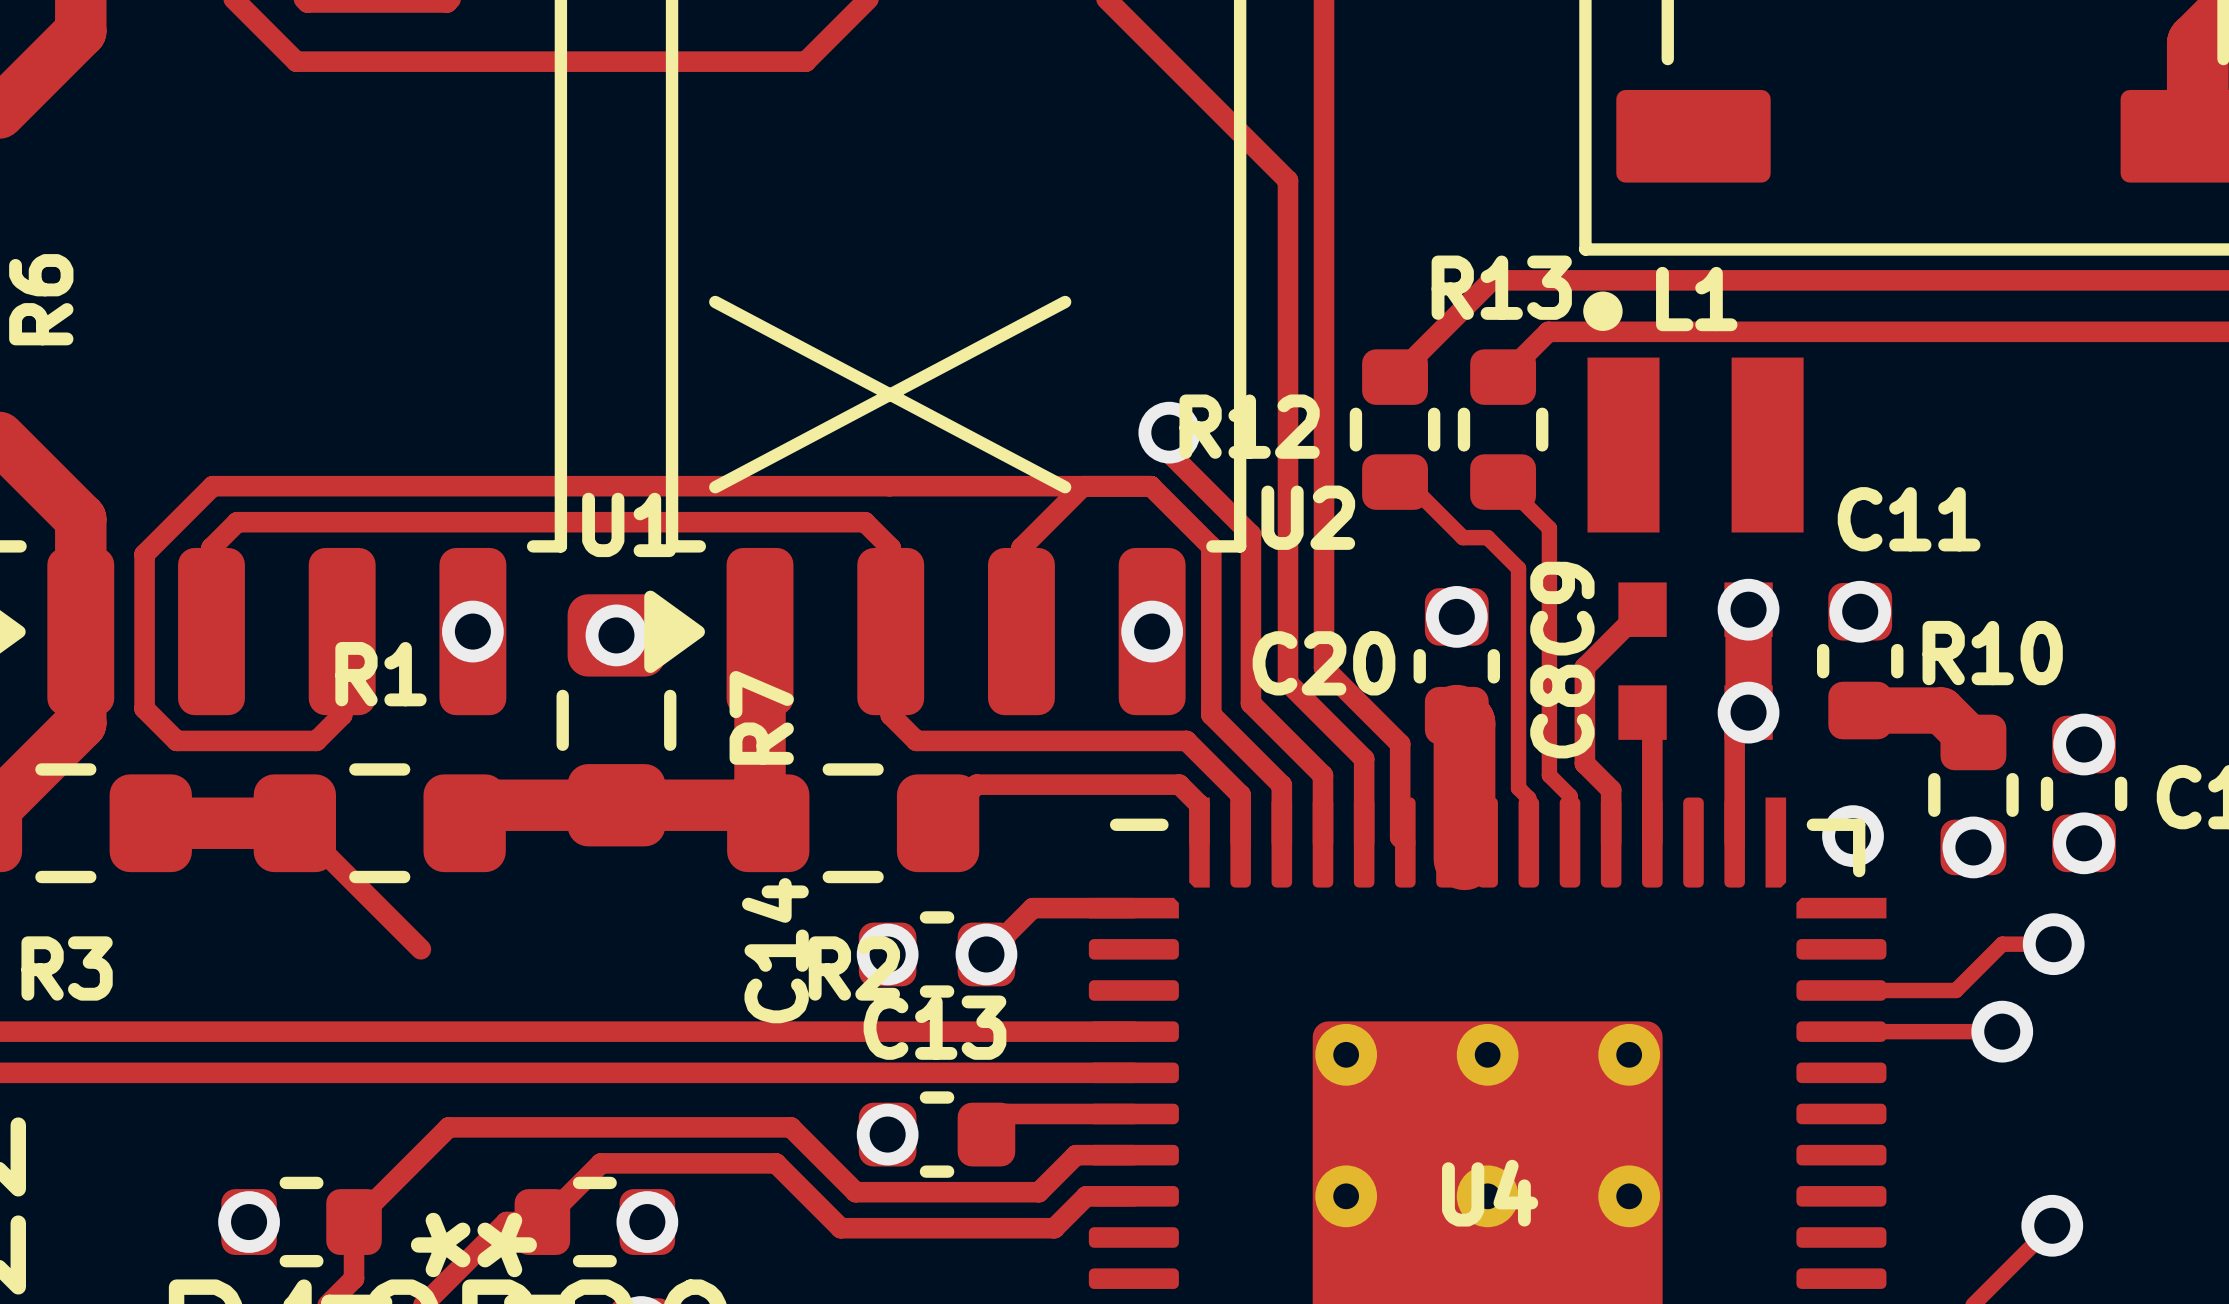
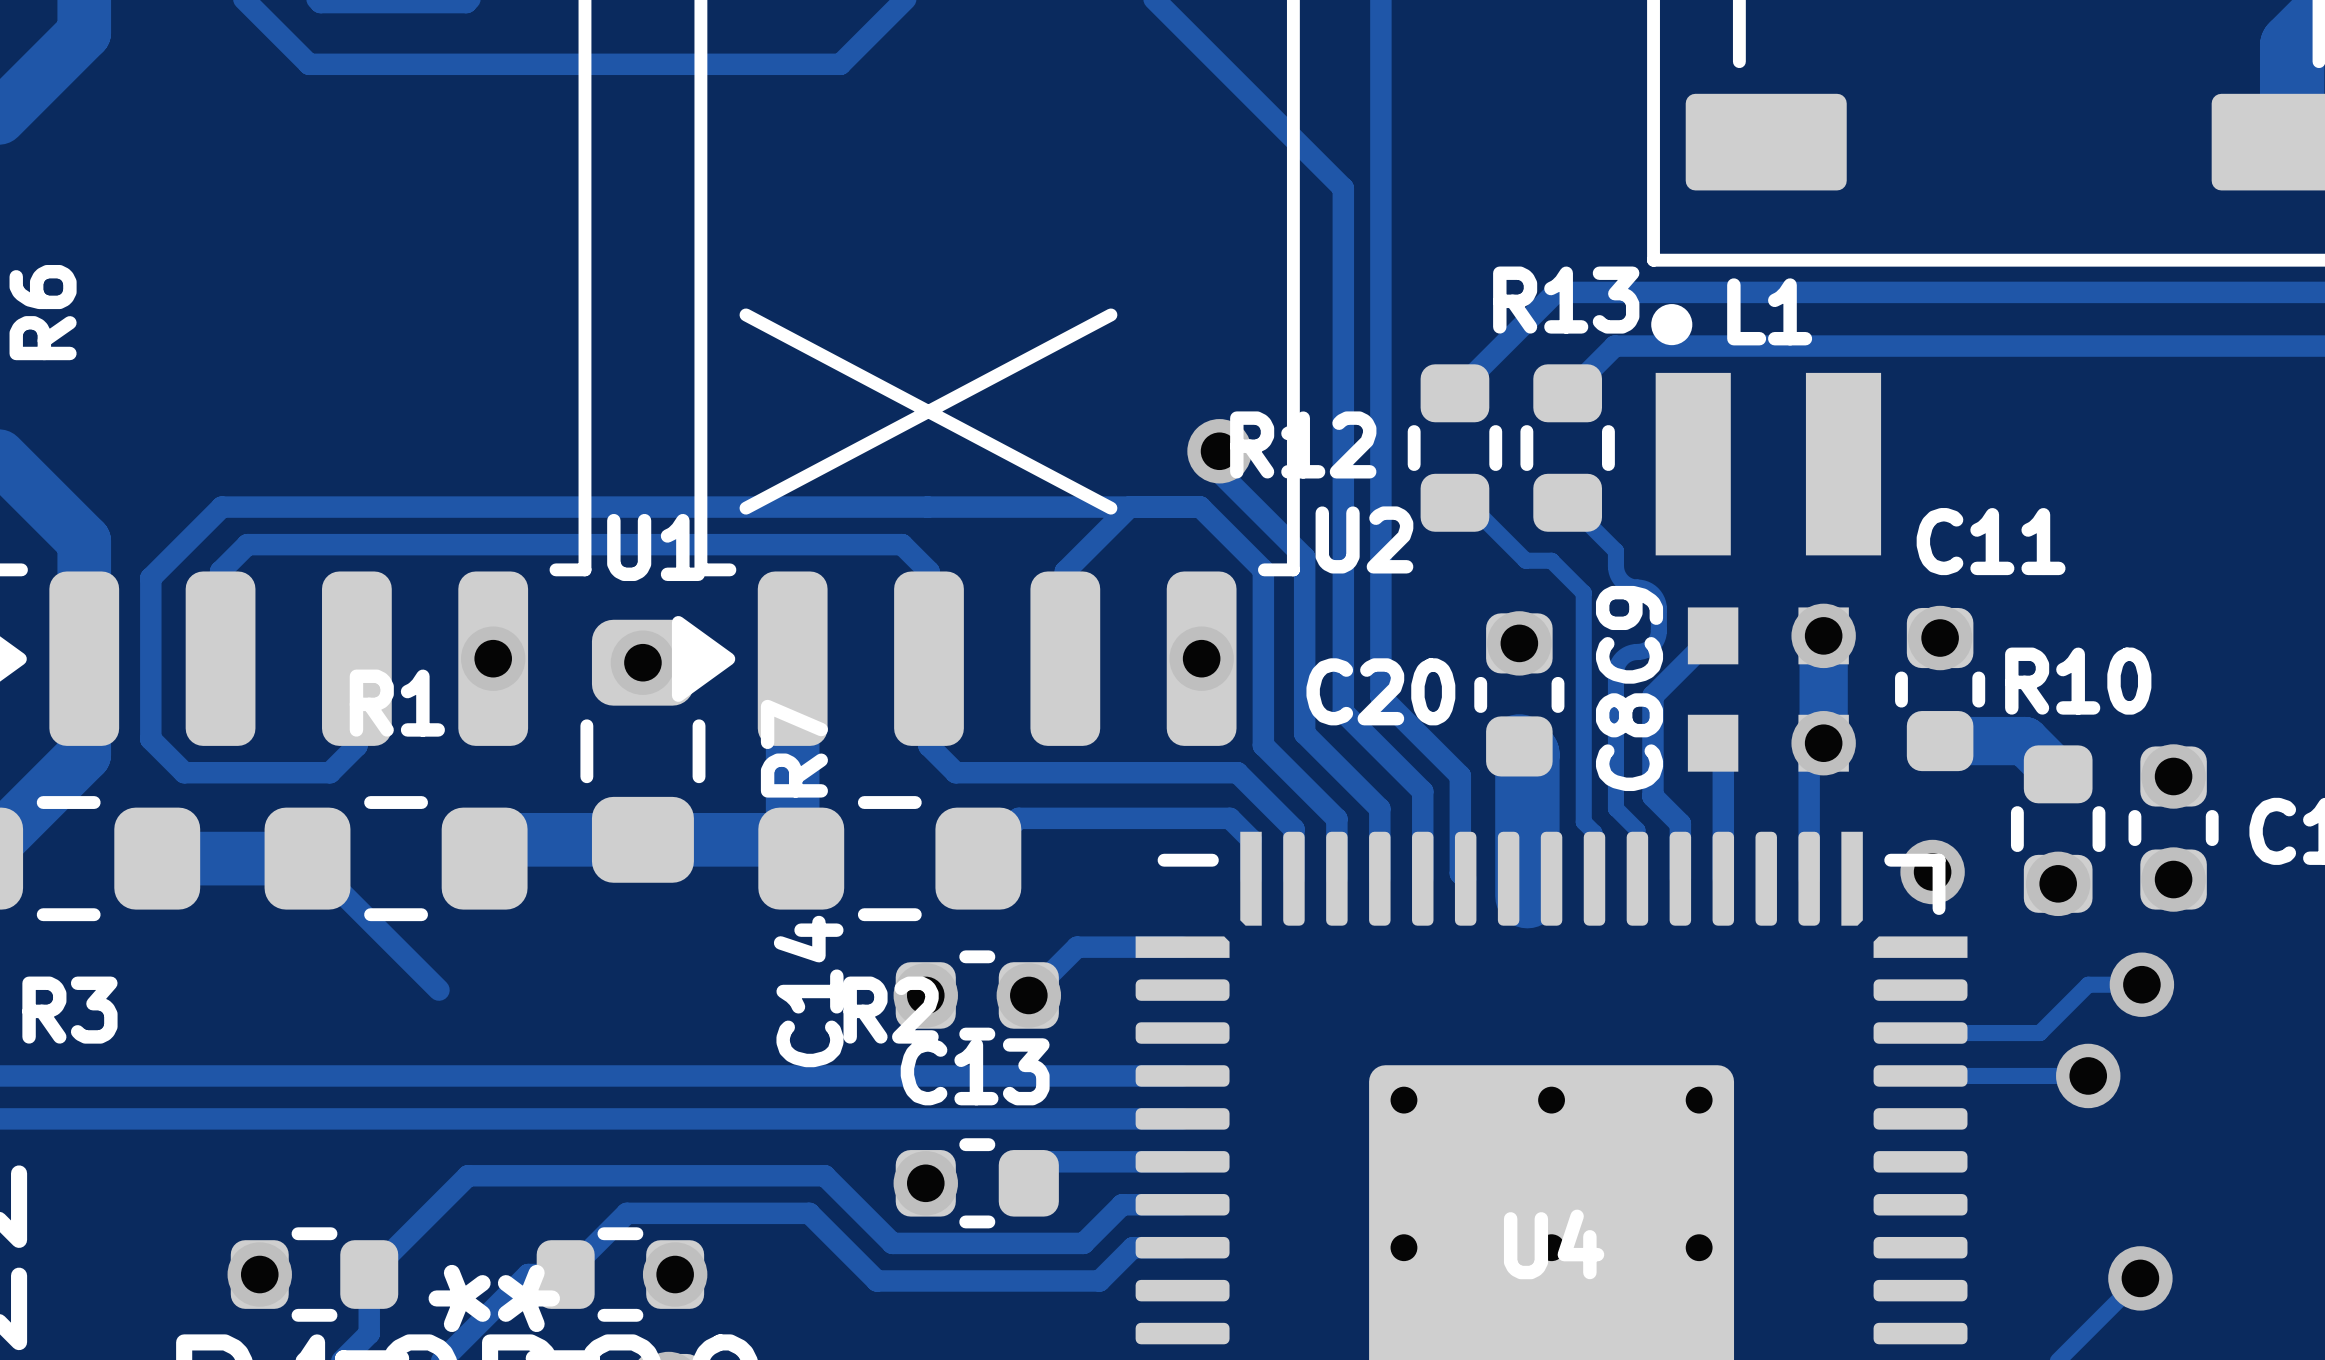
track: (1549, 542) (1549, 645) -> (1615, 566) (1618, 576) (1624, 583) (1631, 586) (1645, 589) (1652, 593) (1657, 600) (1658, 609) (1658, 633) (1656, 641) (1645, 650) (1631, 652) (1624, 656) (1617, 665) (1615, 673)

